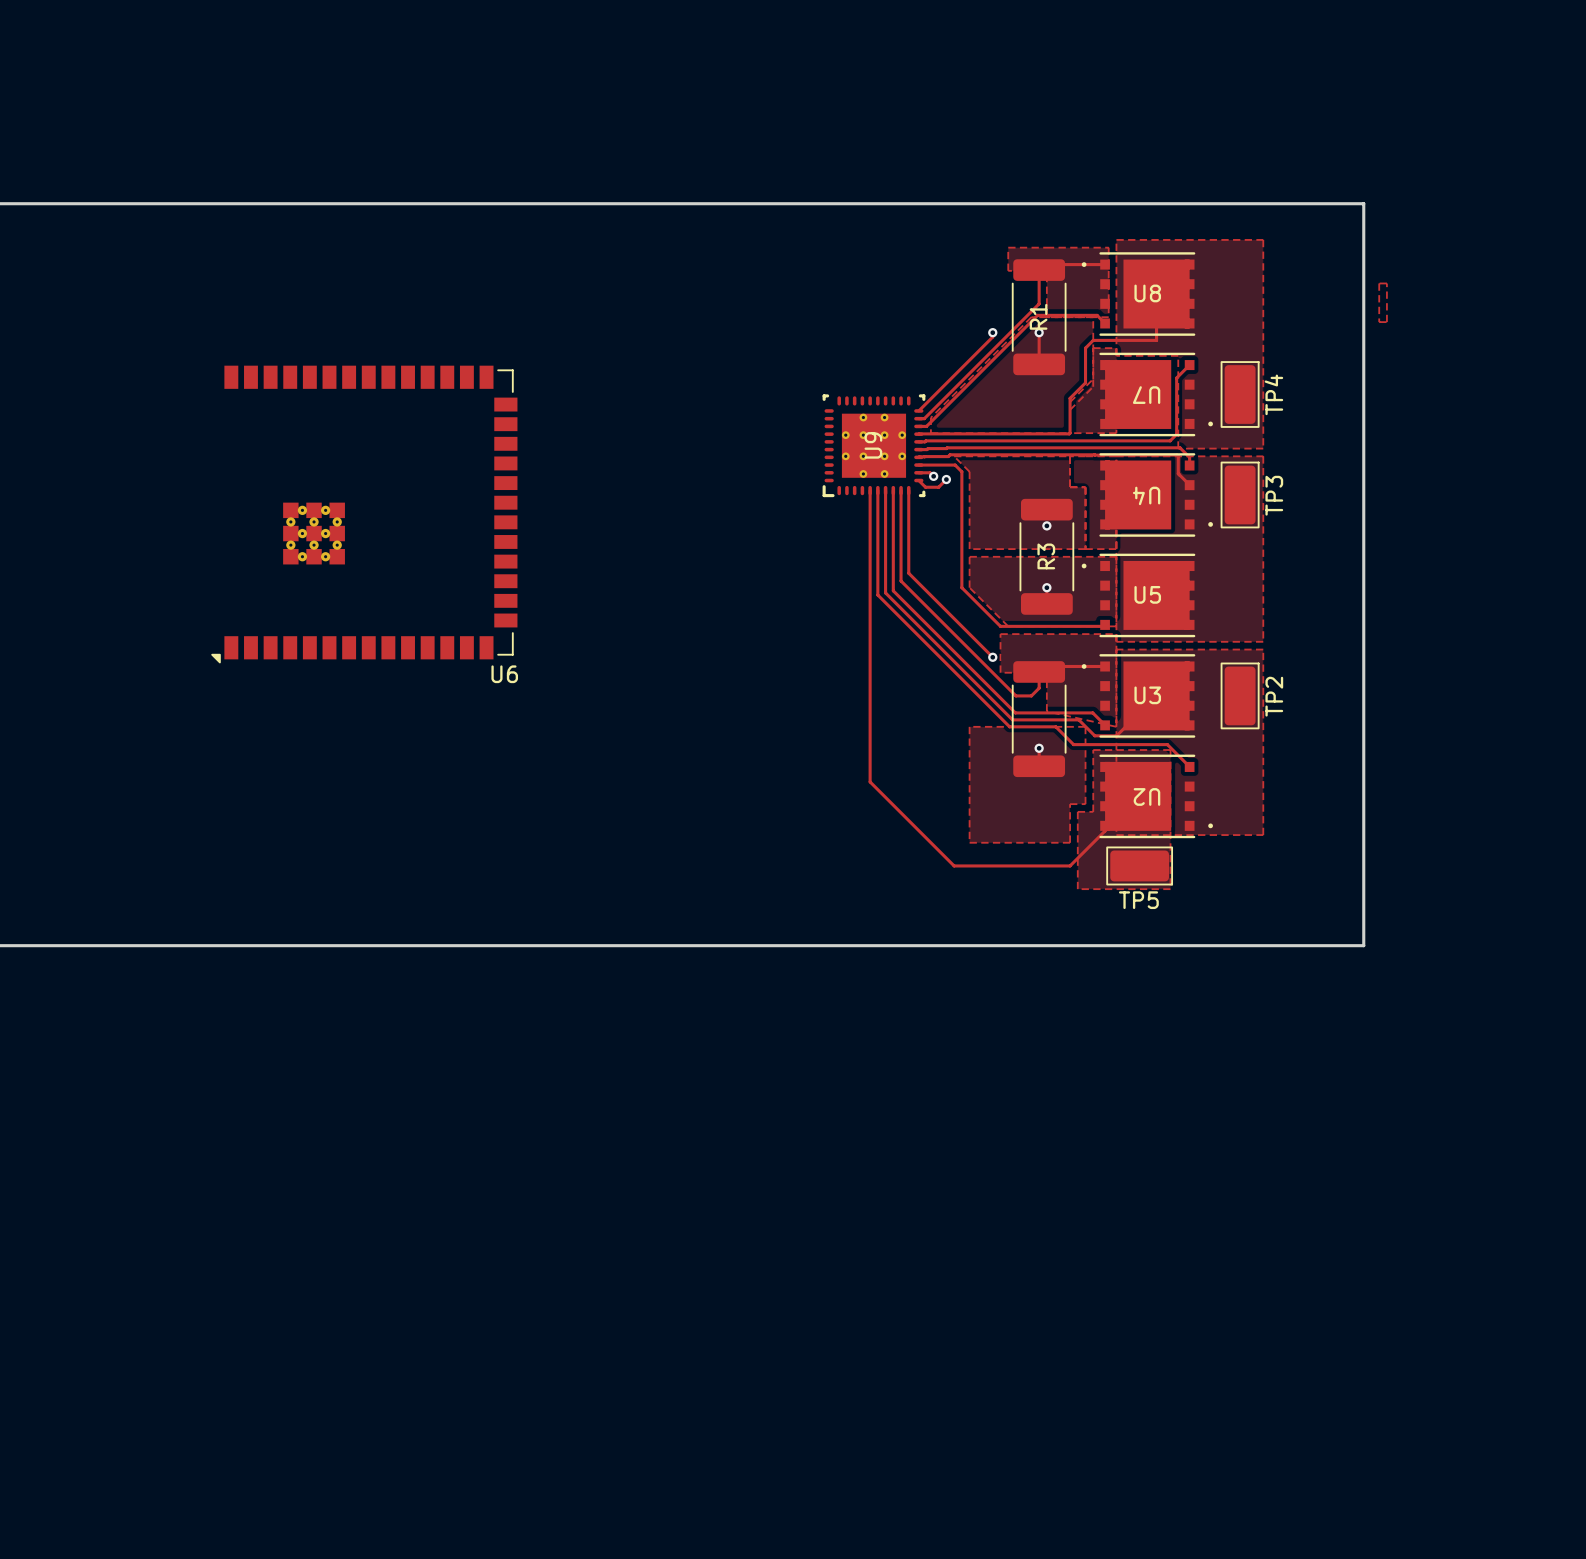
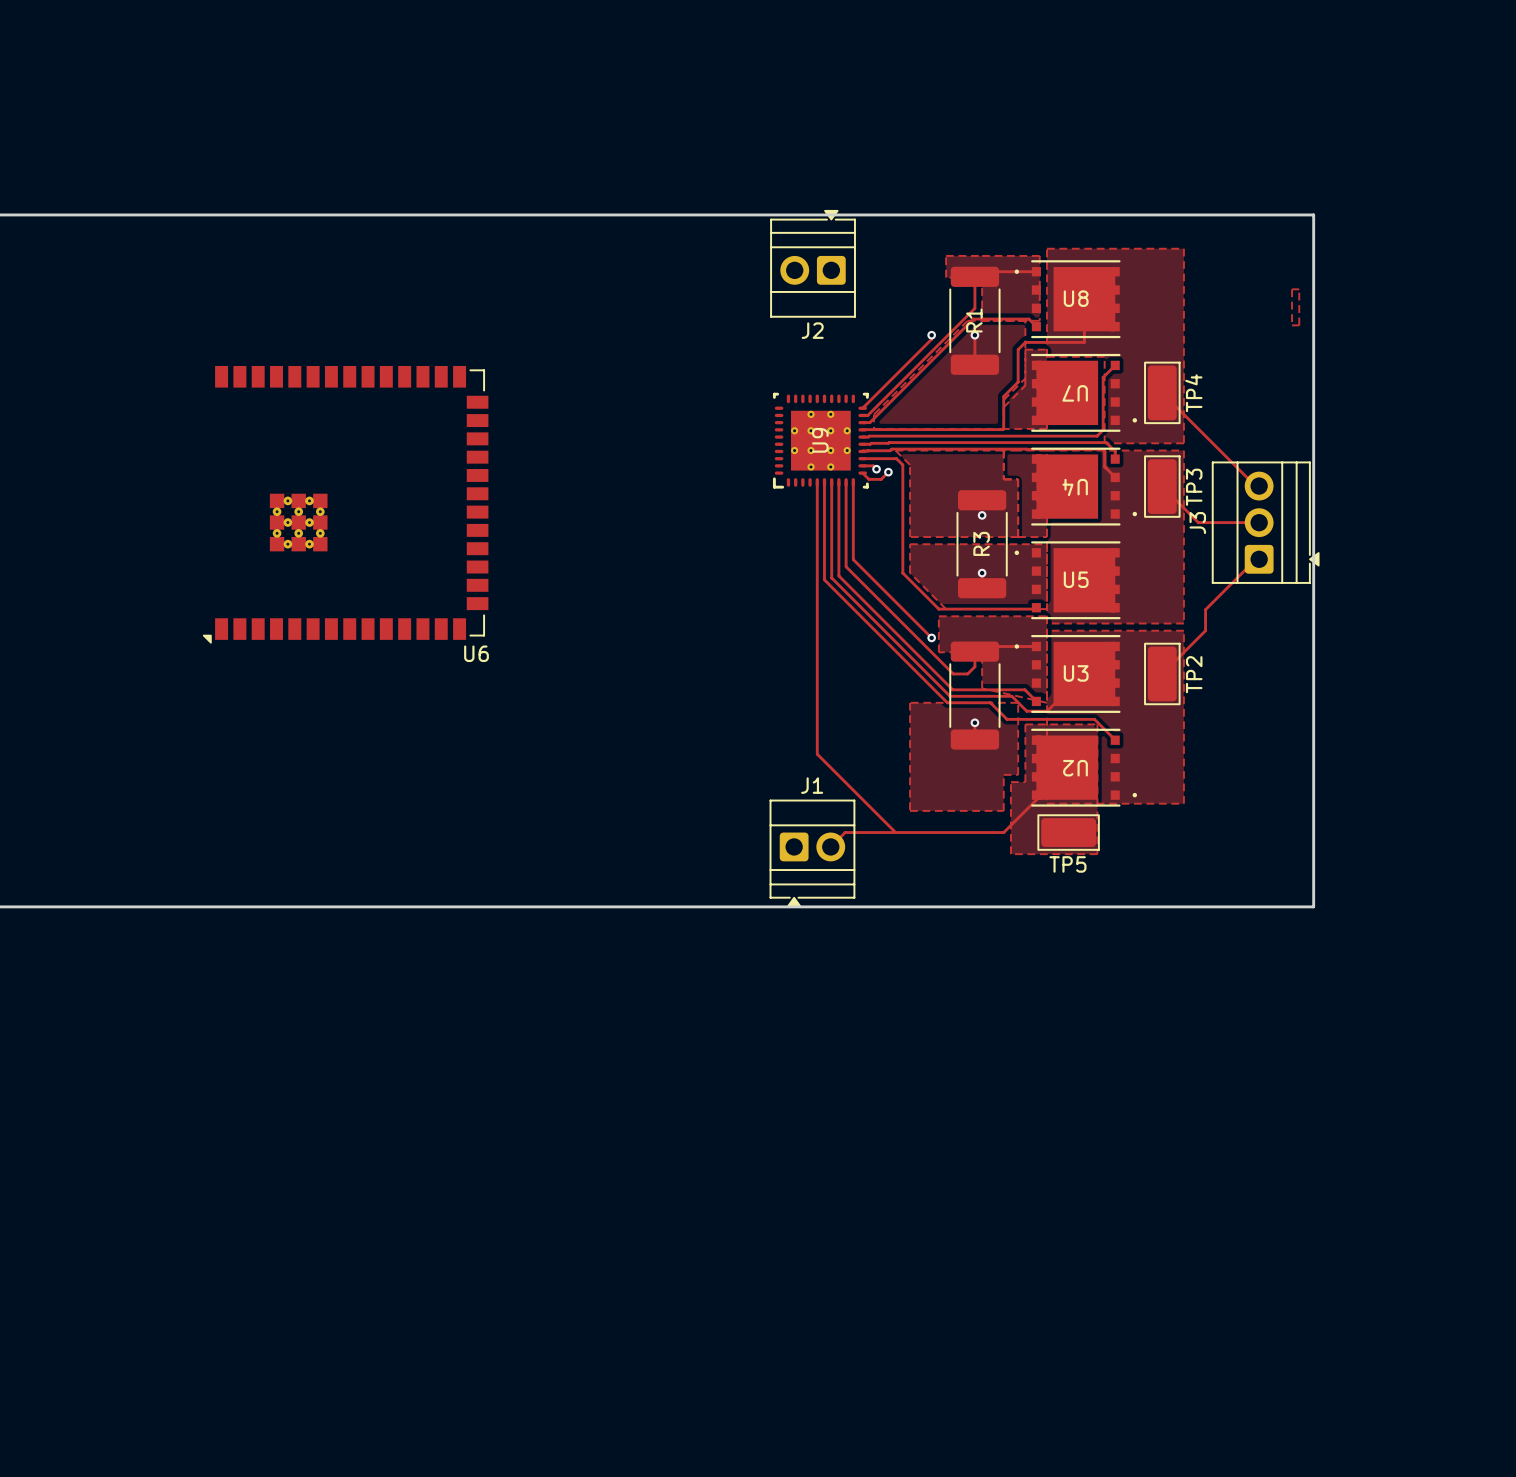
board edge: (1363, 203) (1363, 945) -> (1277, 214) (1313, 214) (1313, 906) (1277, 906)
J2: none -> (813, 263)
track: none -> (1162, 392) (1256, 485)
track: none -> (1162, 486) (1198, 522) (1256, 522)
J3: none -> (1265, 522)
track: none -> (1256, 559) (1205, 609) (1205, 630) (1162, 673)
track: none -> (895, 832) (845, 832) (830, 846)
J1: none -> (812, 853)

